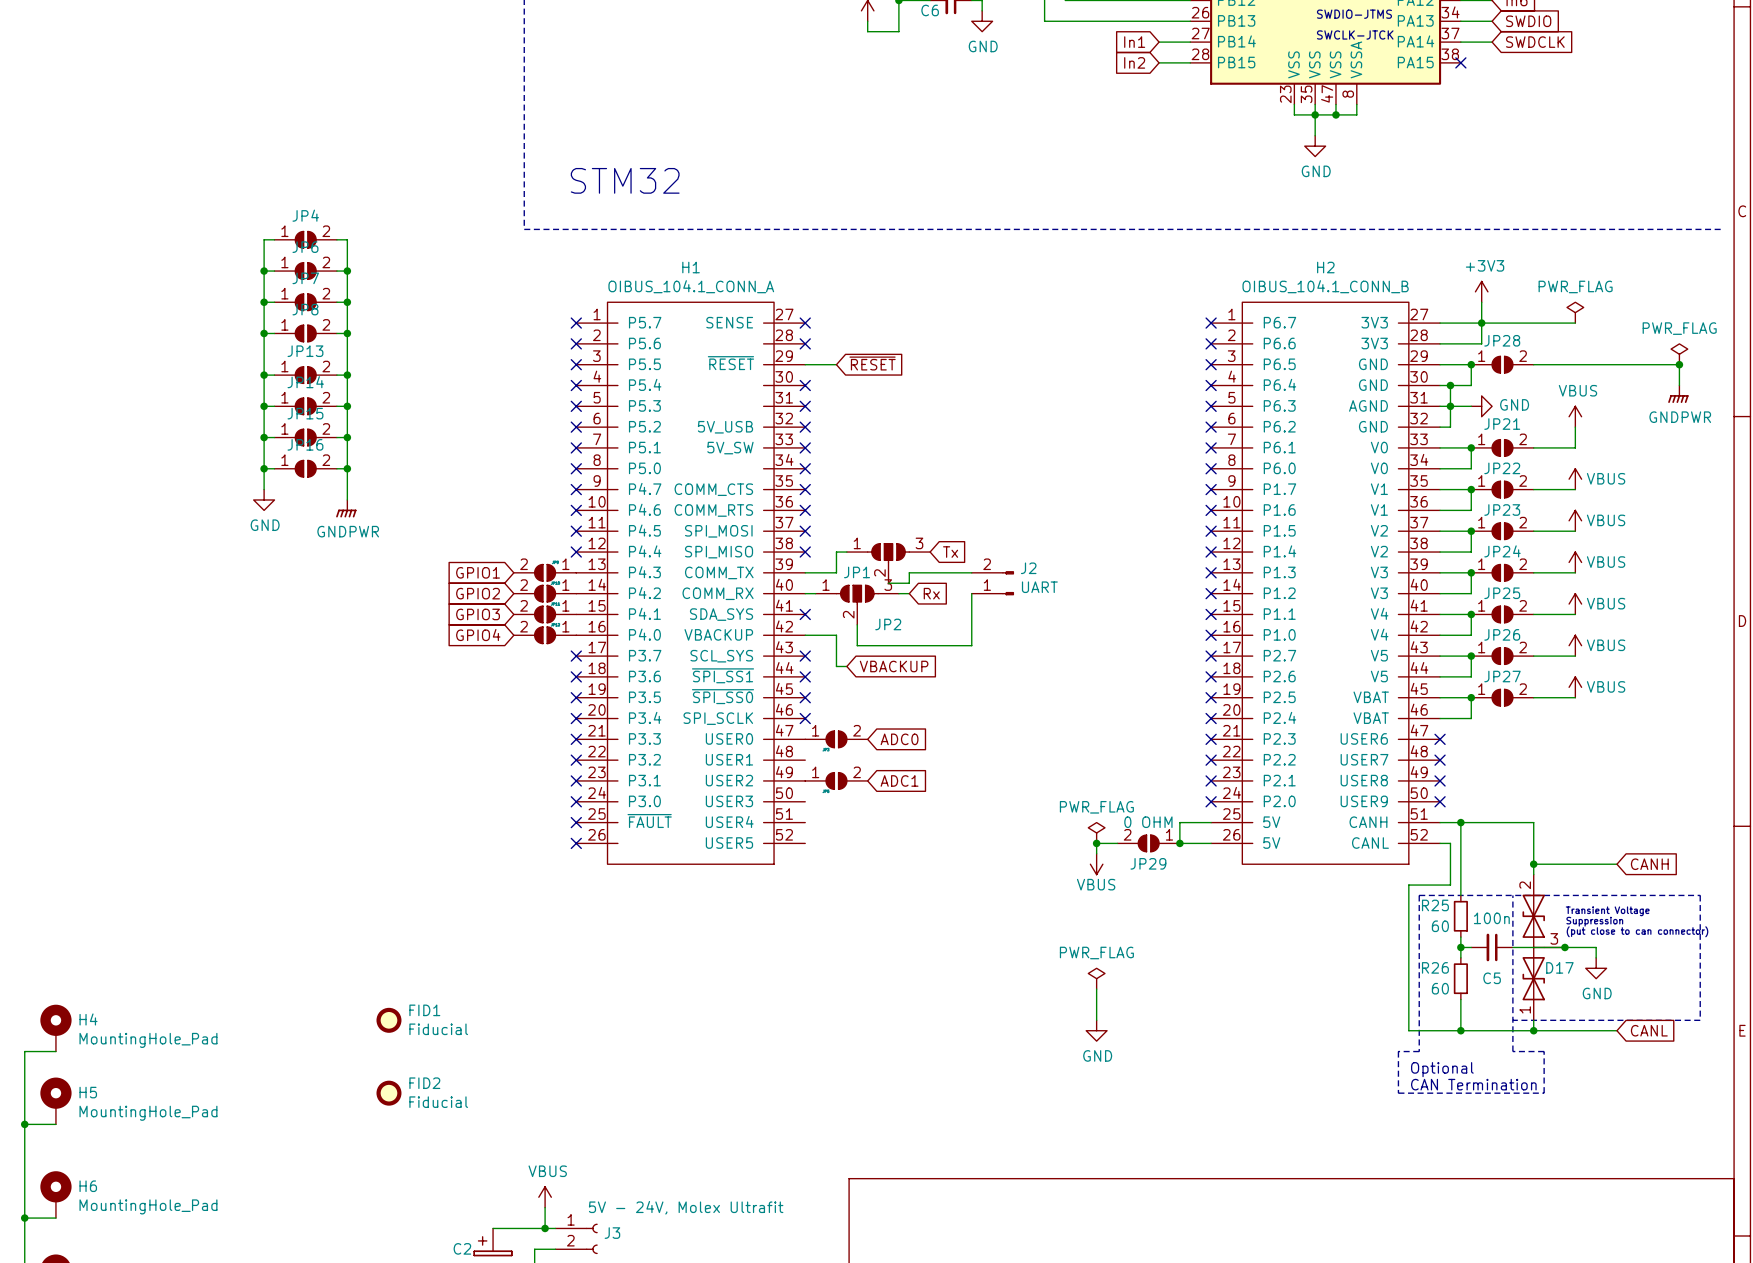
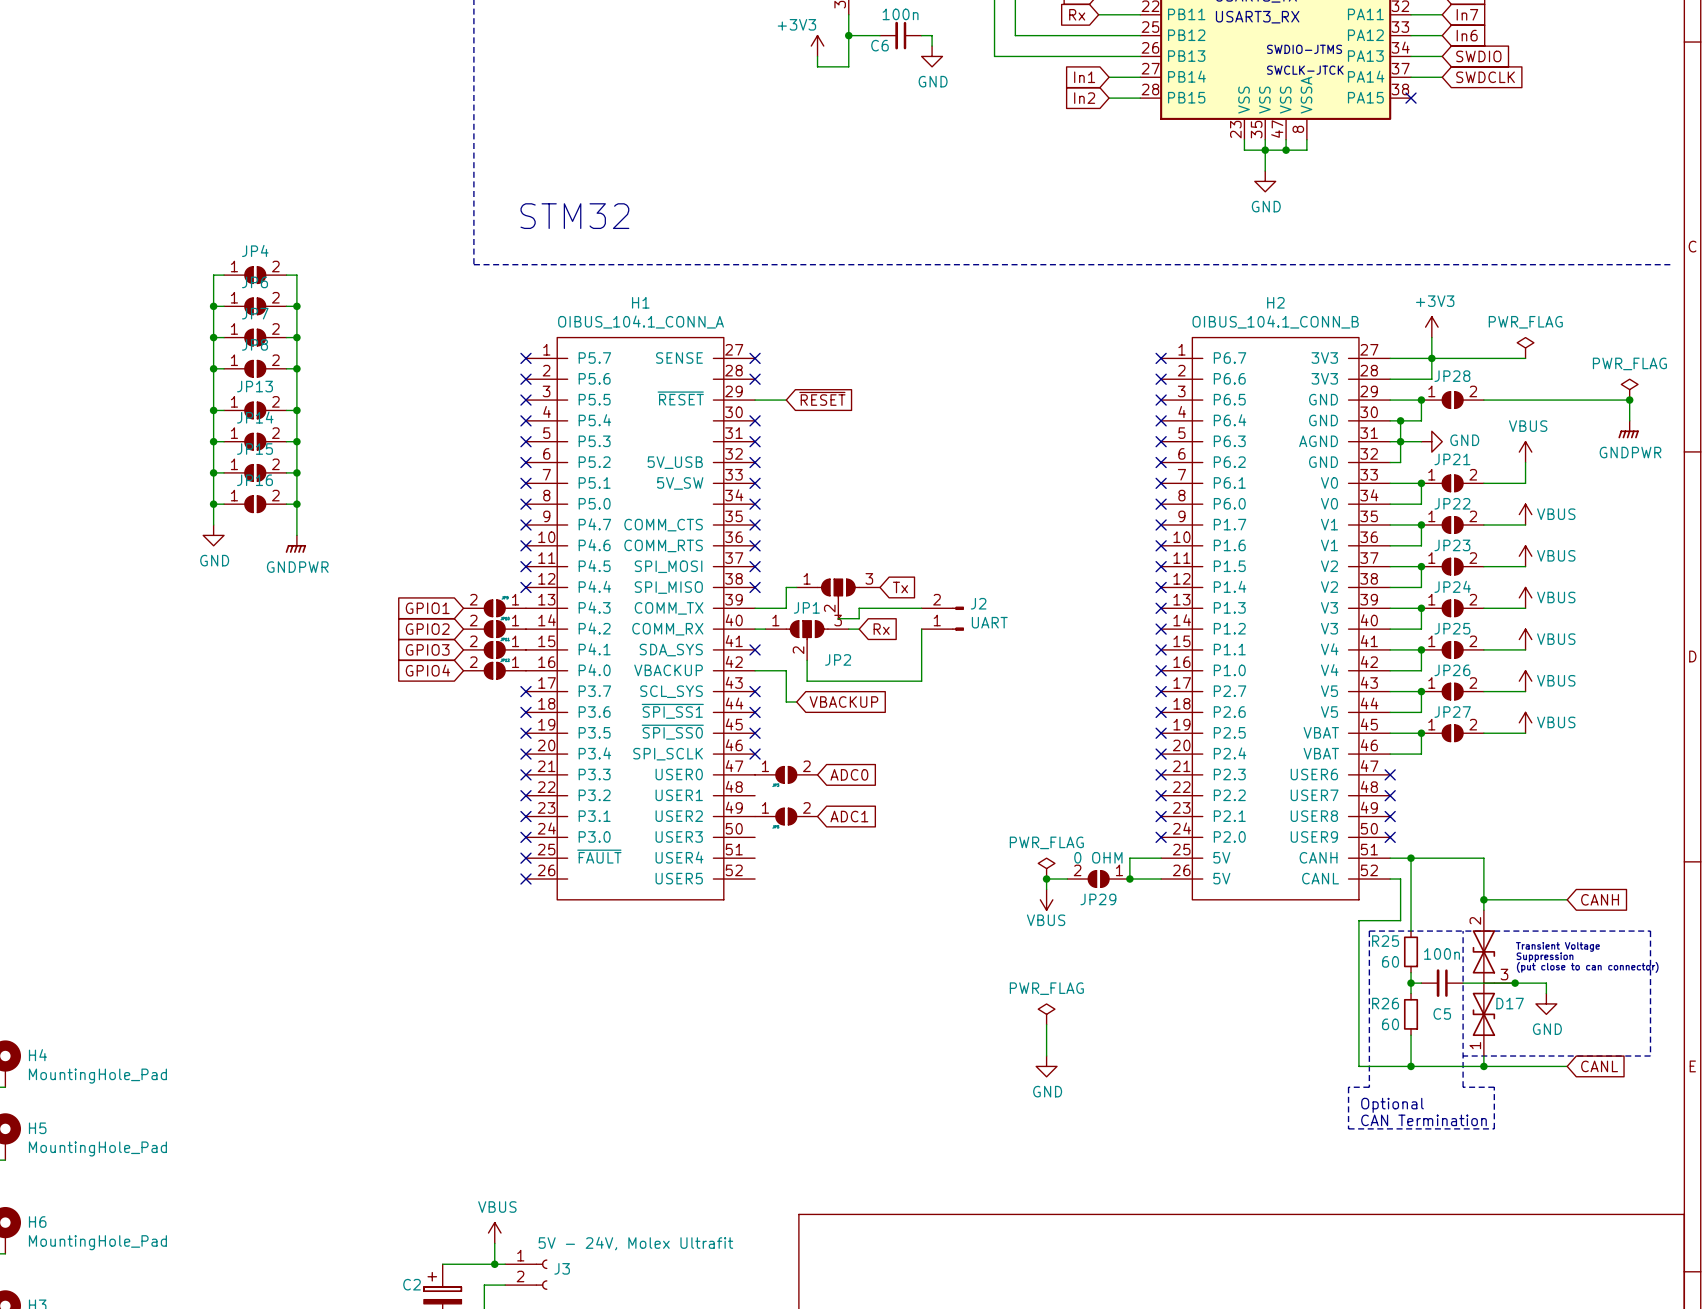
FID1: Fiducial (388, 1020) -> none
FID2: Fiducial (388, 1093) -> none

